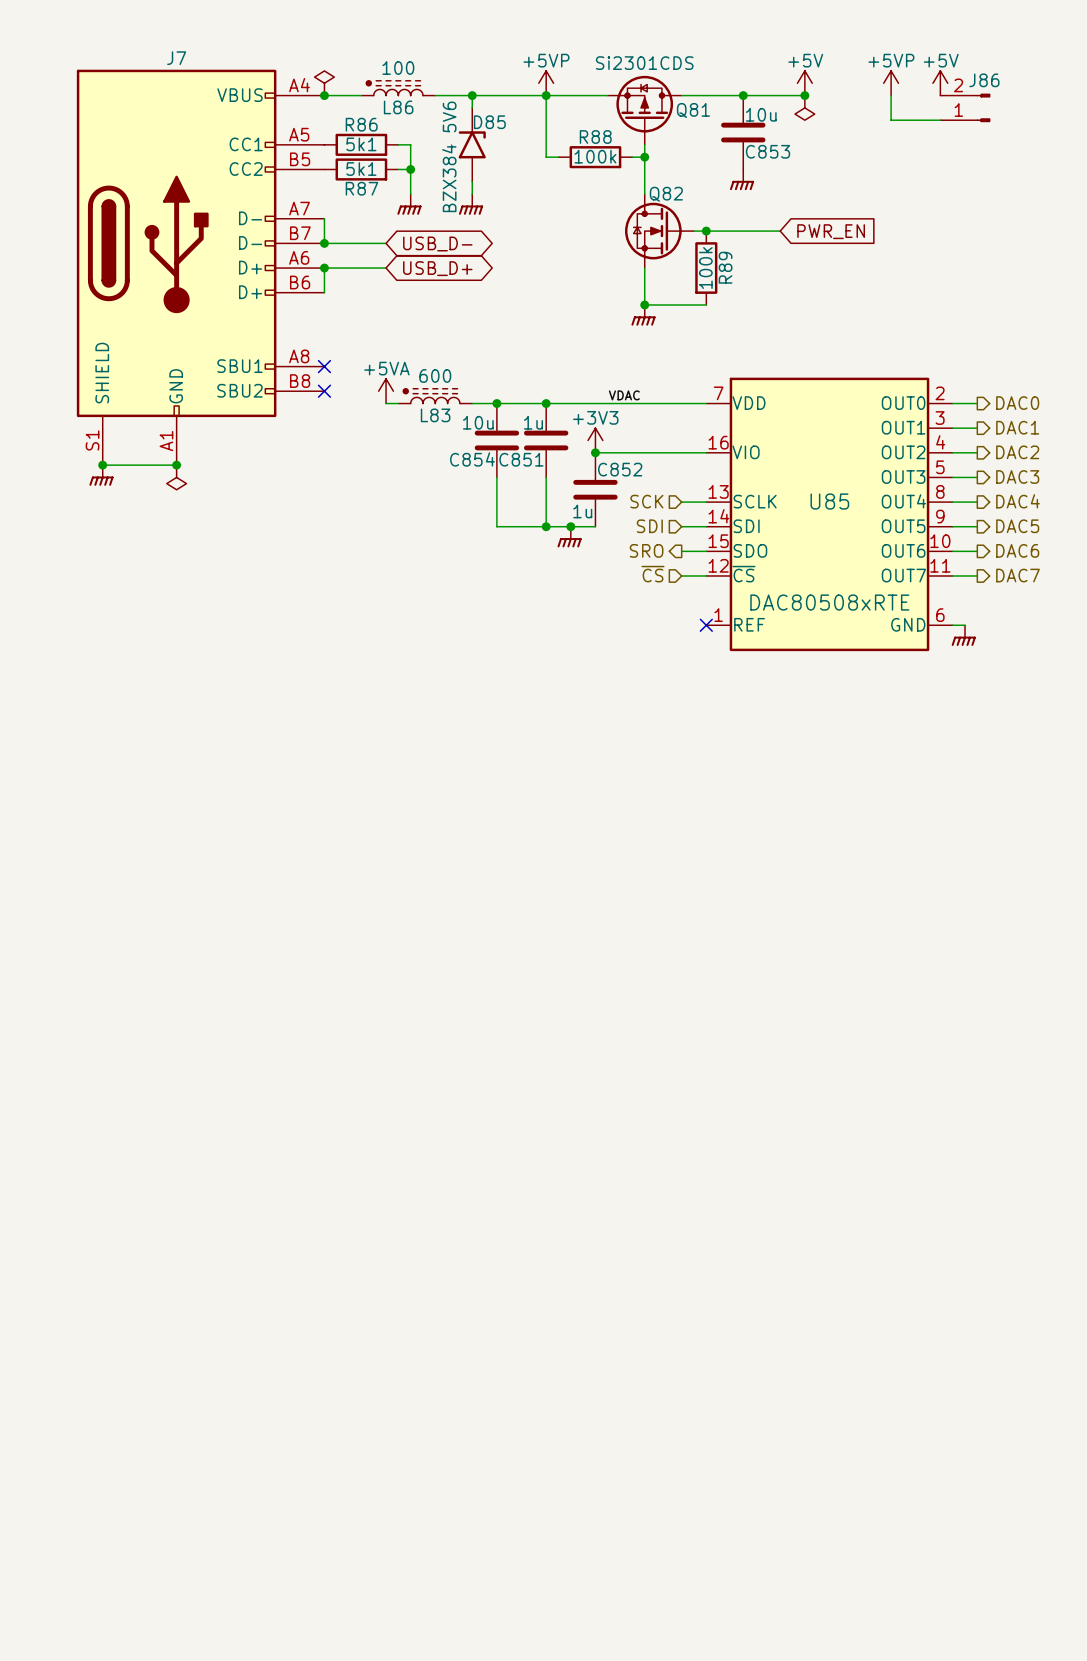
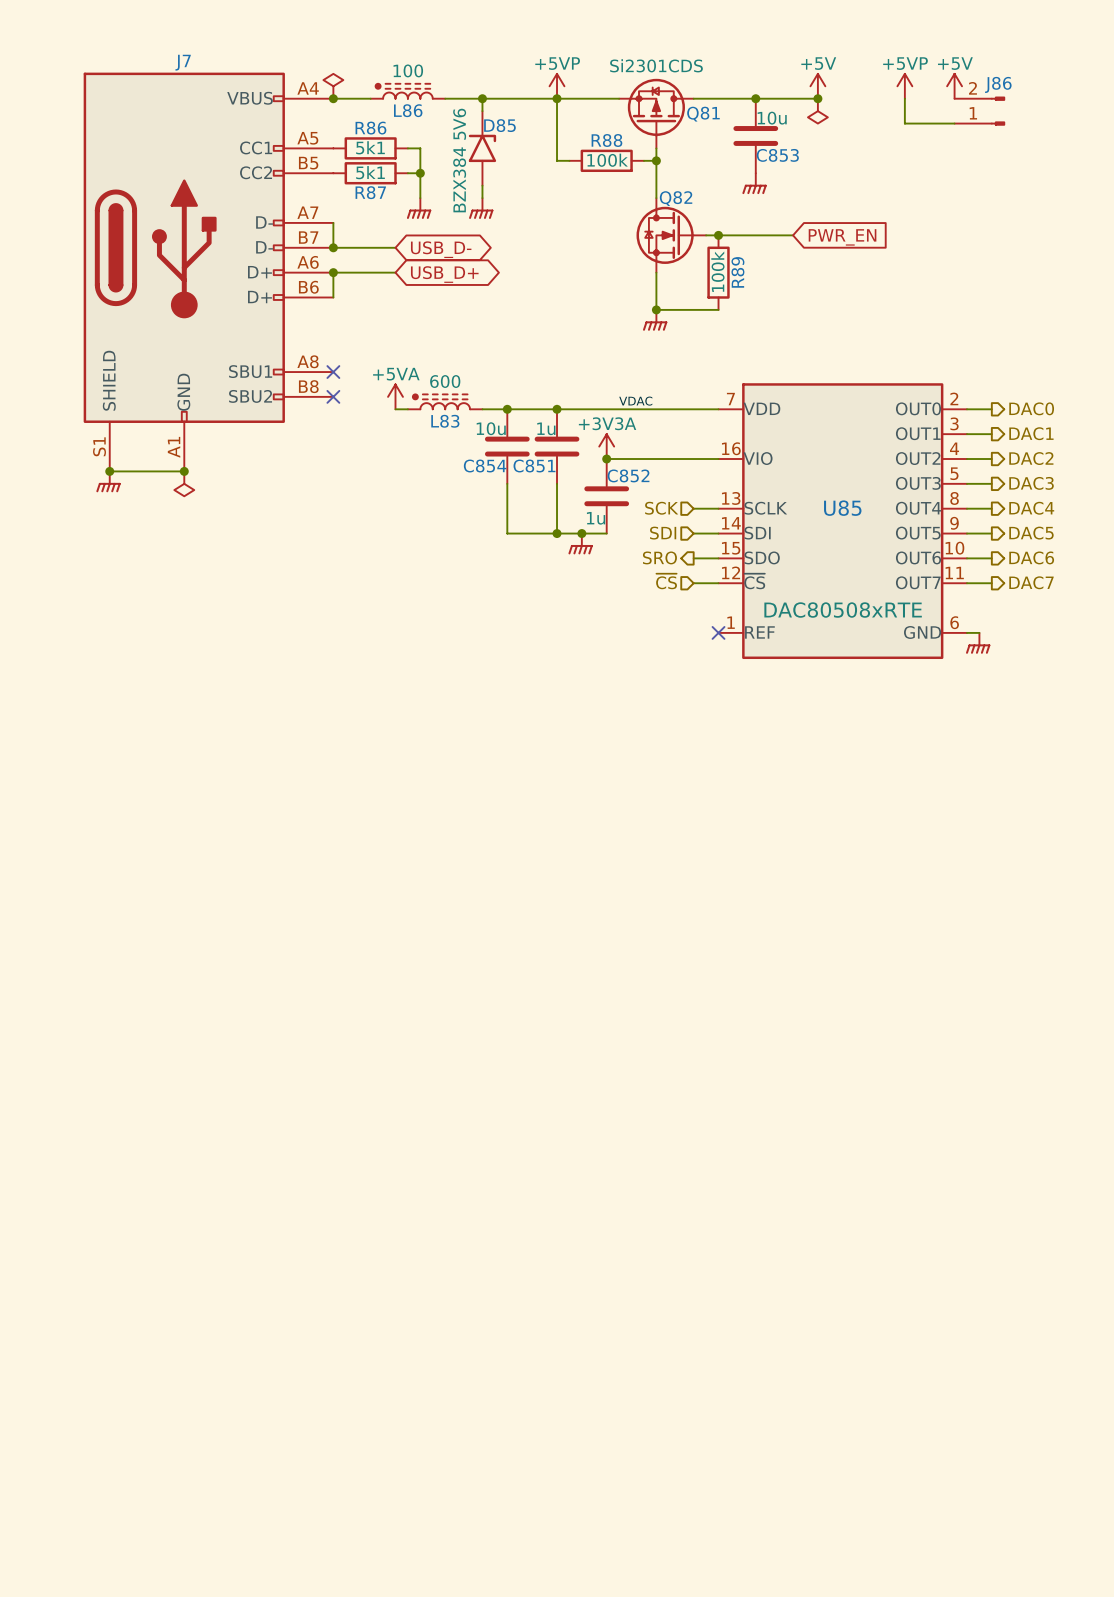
power symbol: +3V3 (595, 440) -> +3V3A (606, 446)

